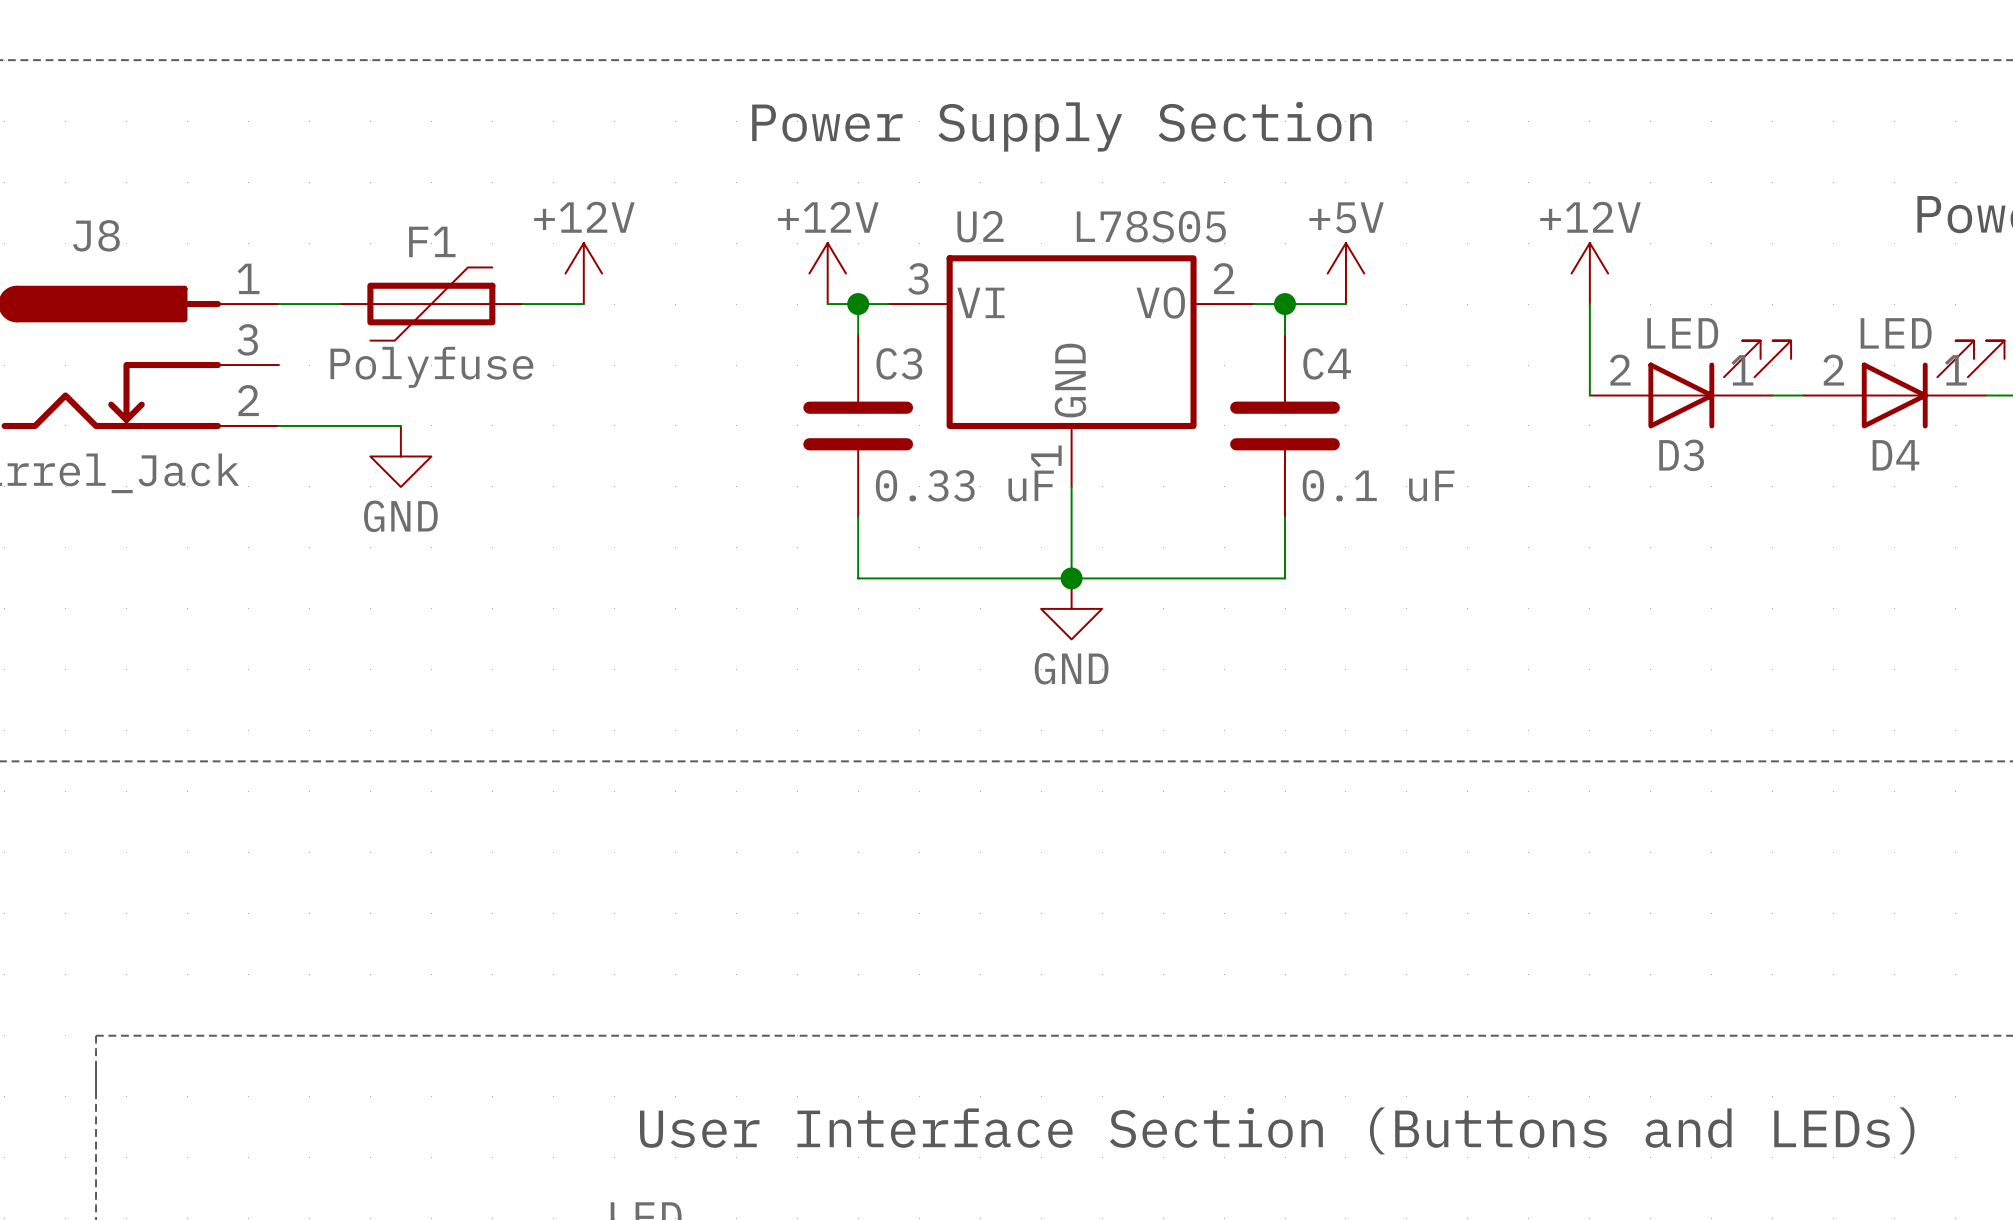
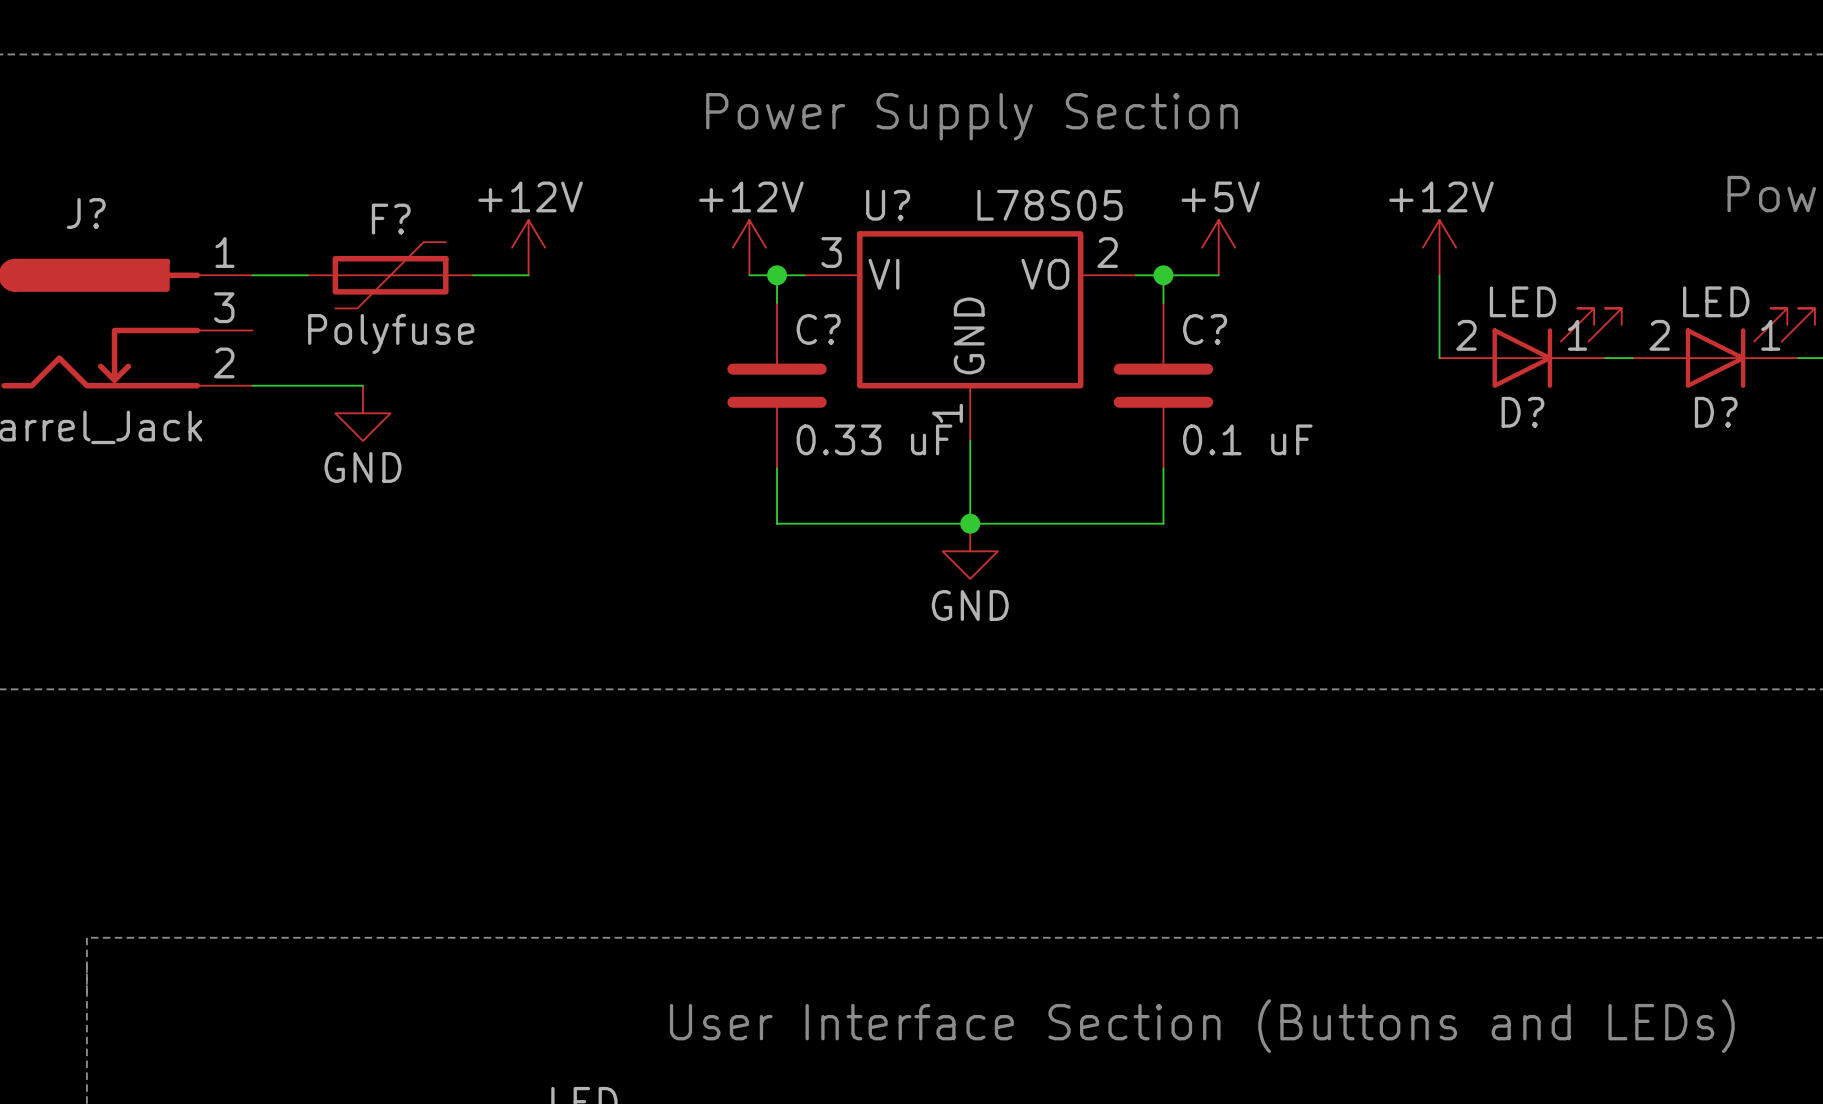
U2 name: U2 (980, 226) -> U? (888, 205)
J8 name: J8 (96, 235) -> J? (86, 213)
F1 name: F1 (432, 241) -> F? (391, 219)
C3 name: C3 (899, 363) -> C? (818, 329)
C4 name: C4 (1327, 363) -> C? (1205, 329)
D3 name: D3 (1681, 455) -> D? (1522, 412)
D4 name: D4 (1895, 455) -> D? (1716, 412)

